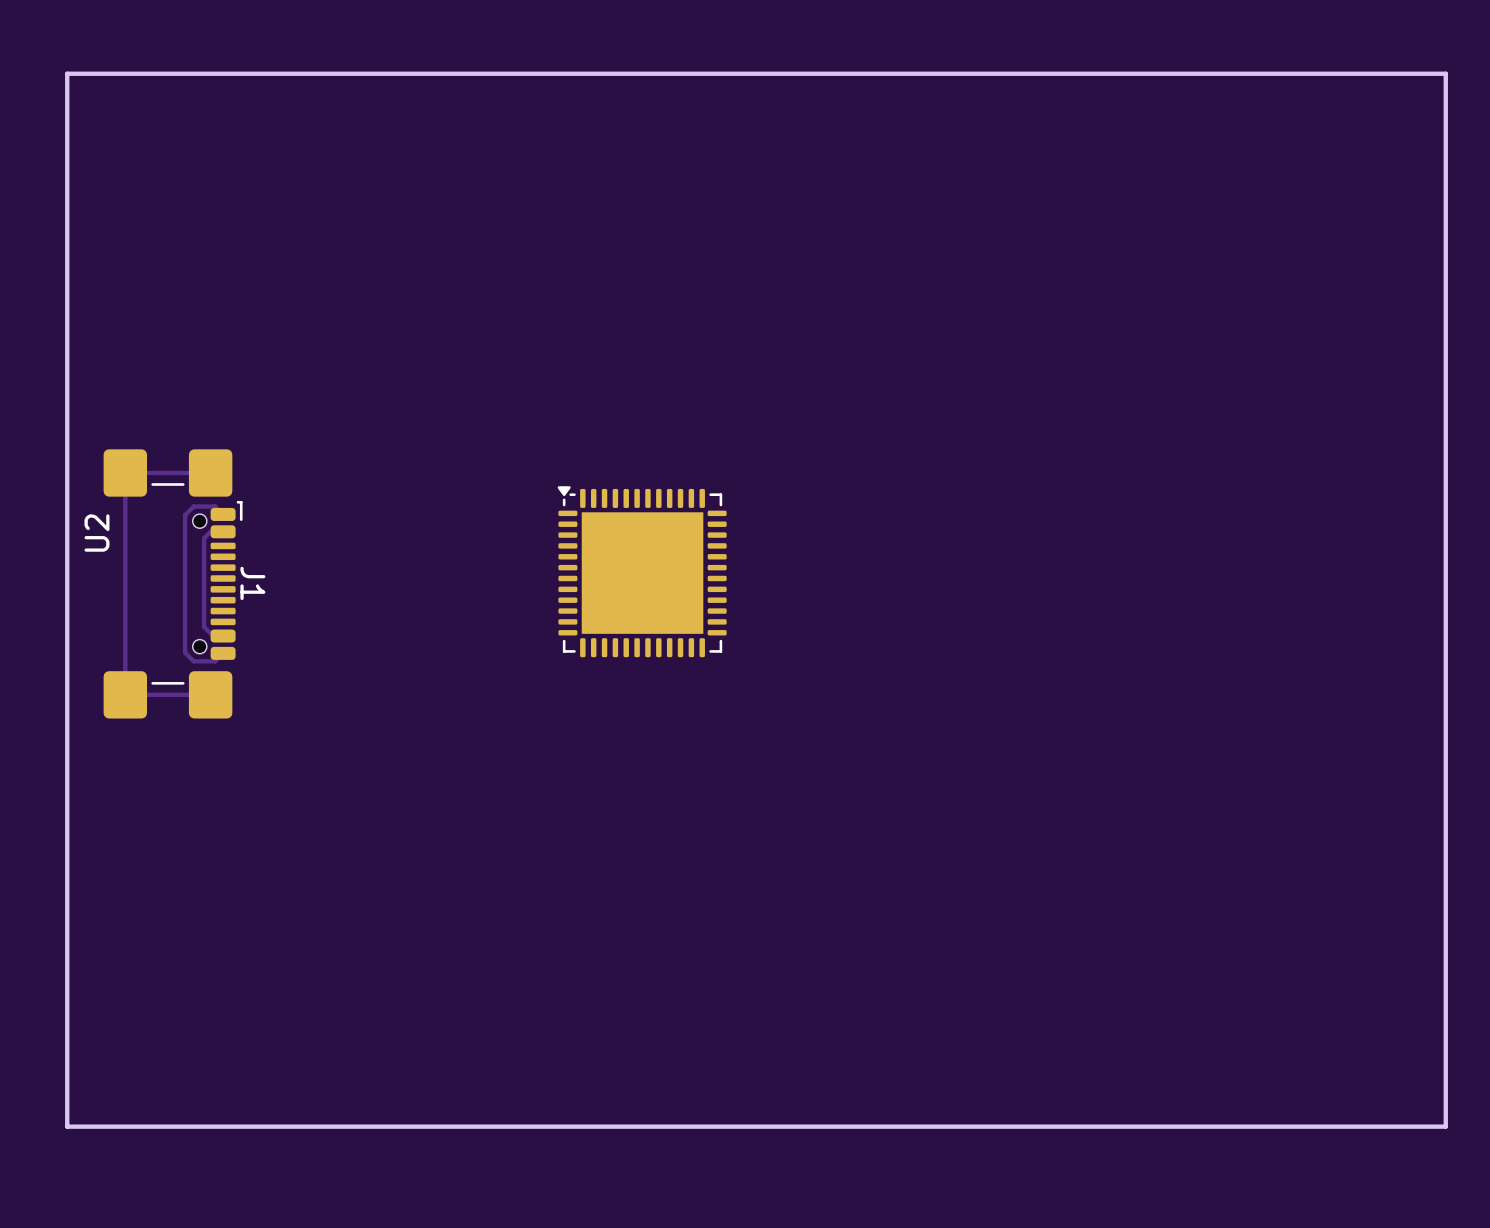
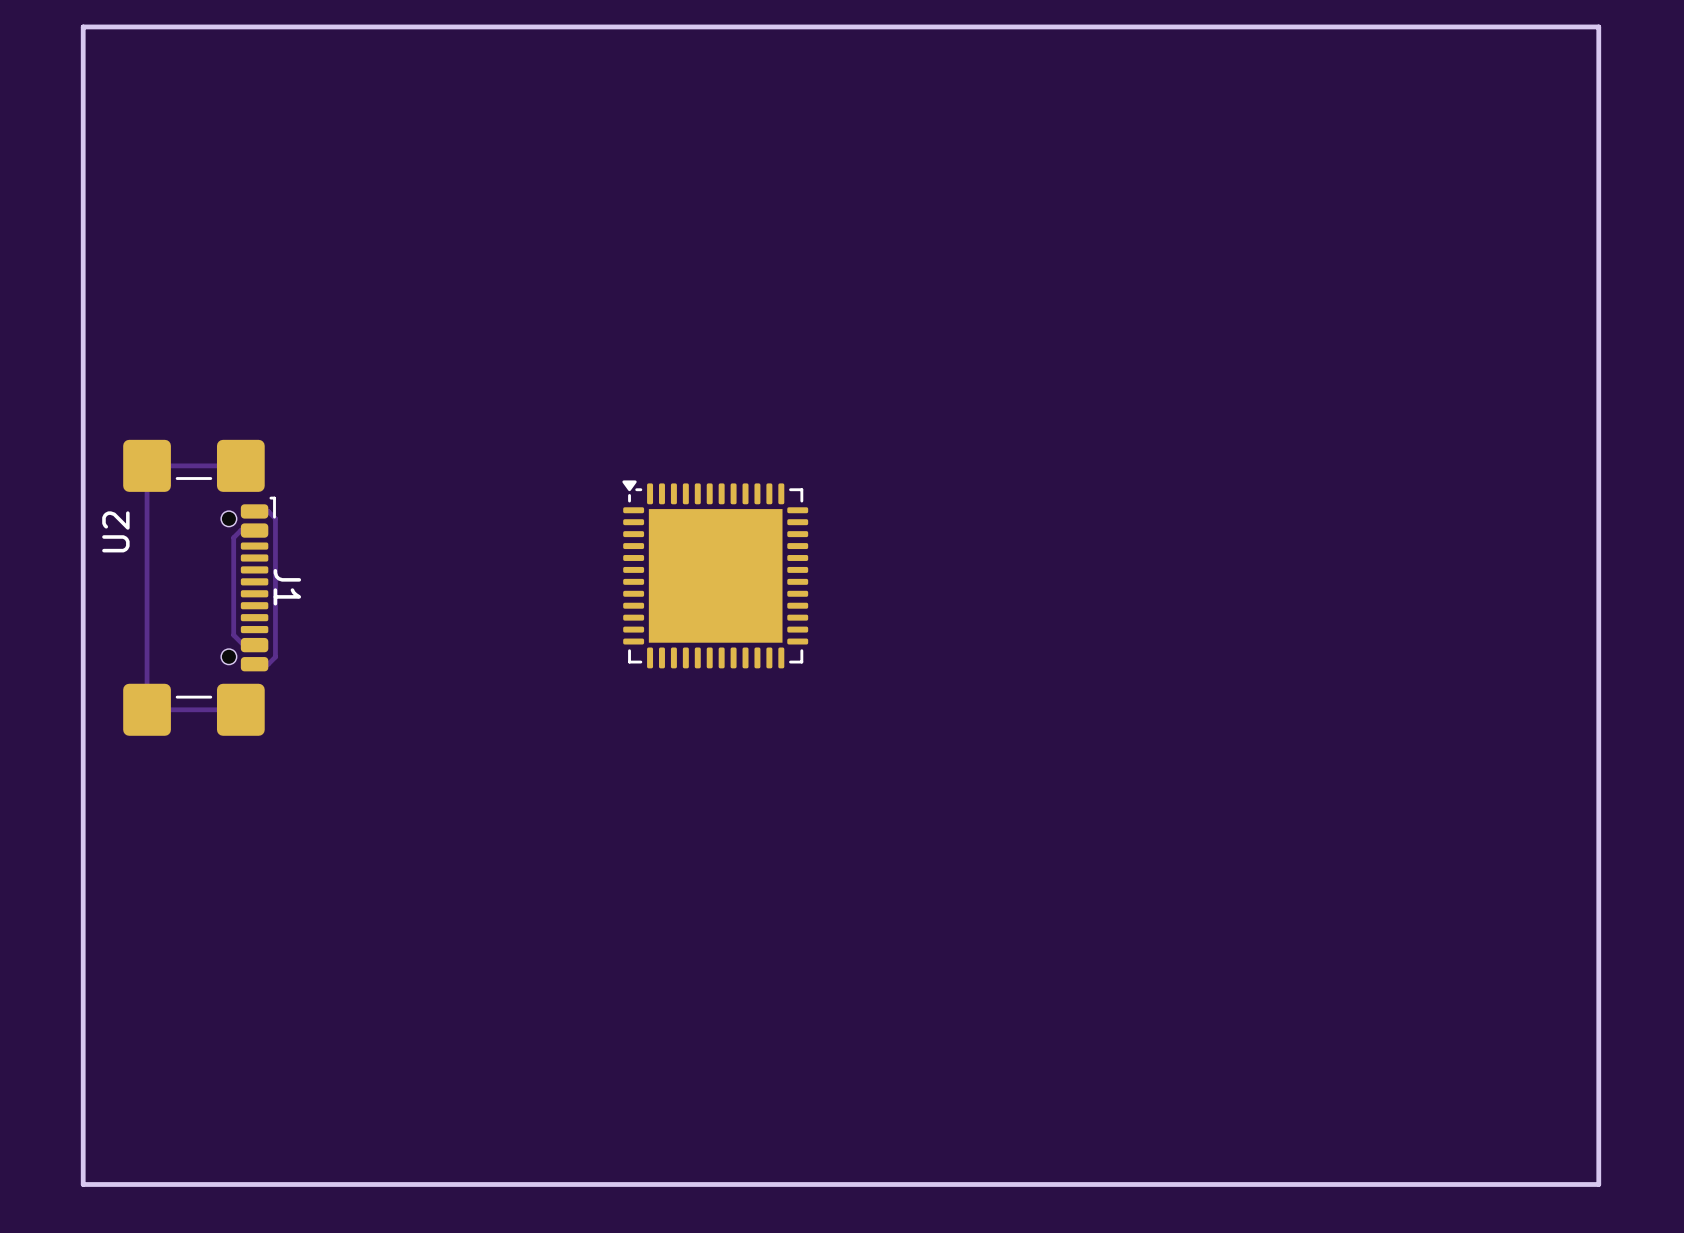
track: (223, 514) (215, 506) (193, 506) (185, 515) (185, 652) (193, 661) (215, 661) (223, 653) -> (254, 511) (268, 511) (275, 518) (275, 657) (268, 664) (254, 664)

